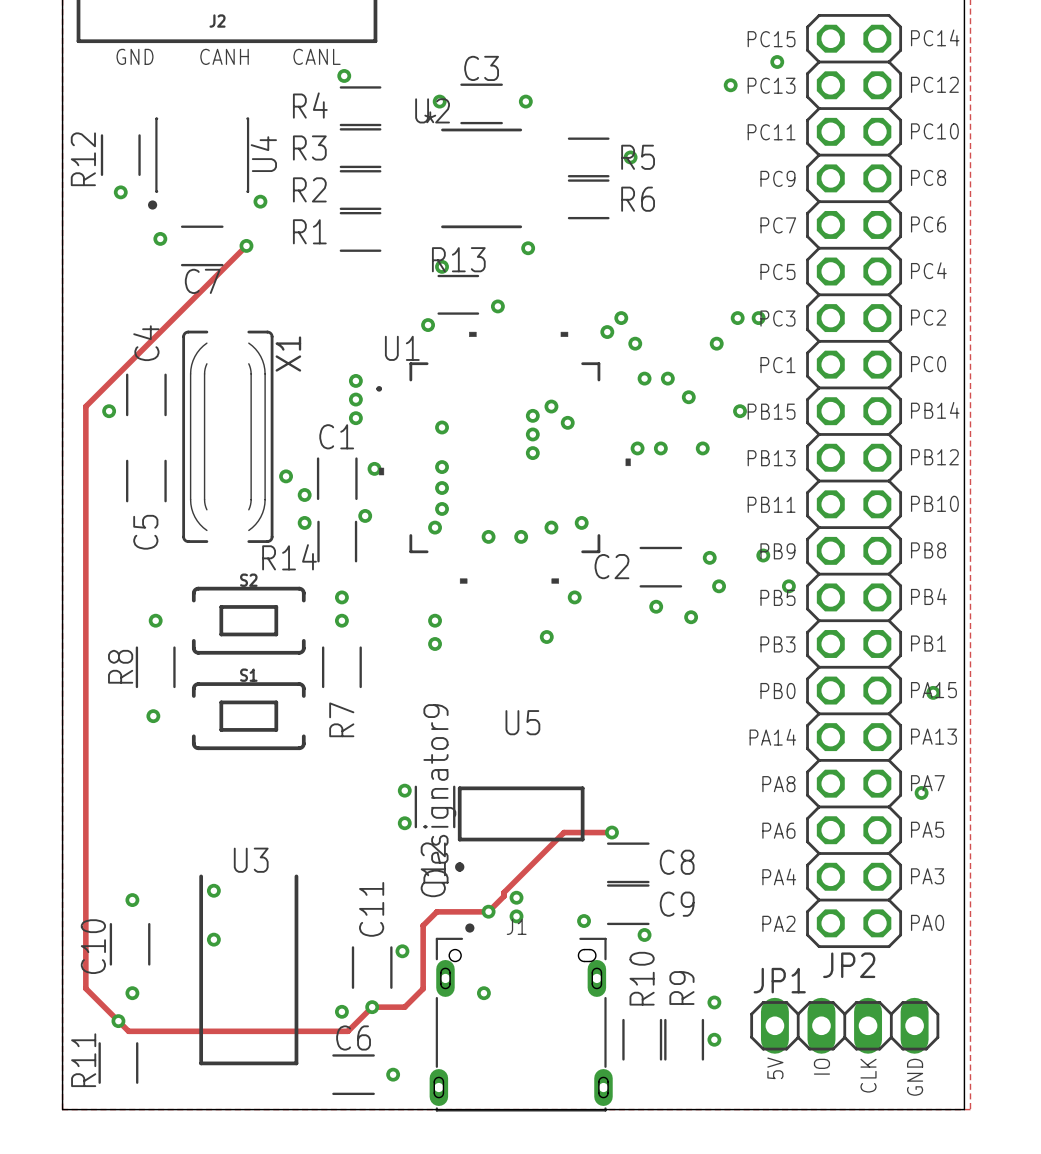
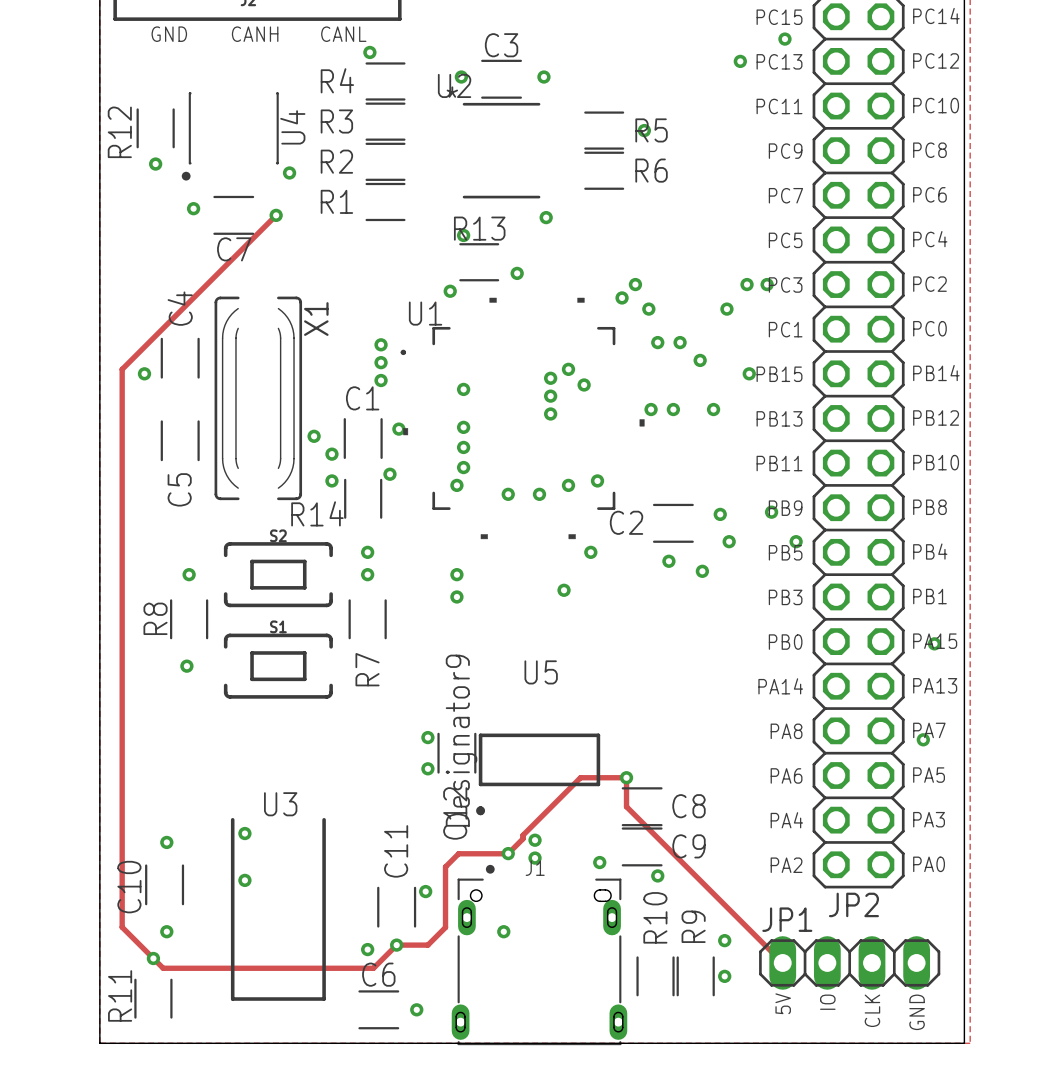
track: none -> (626, 777) (626, 806) (782, 962)

